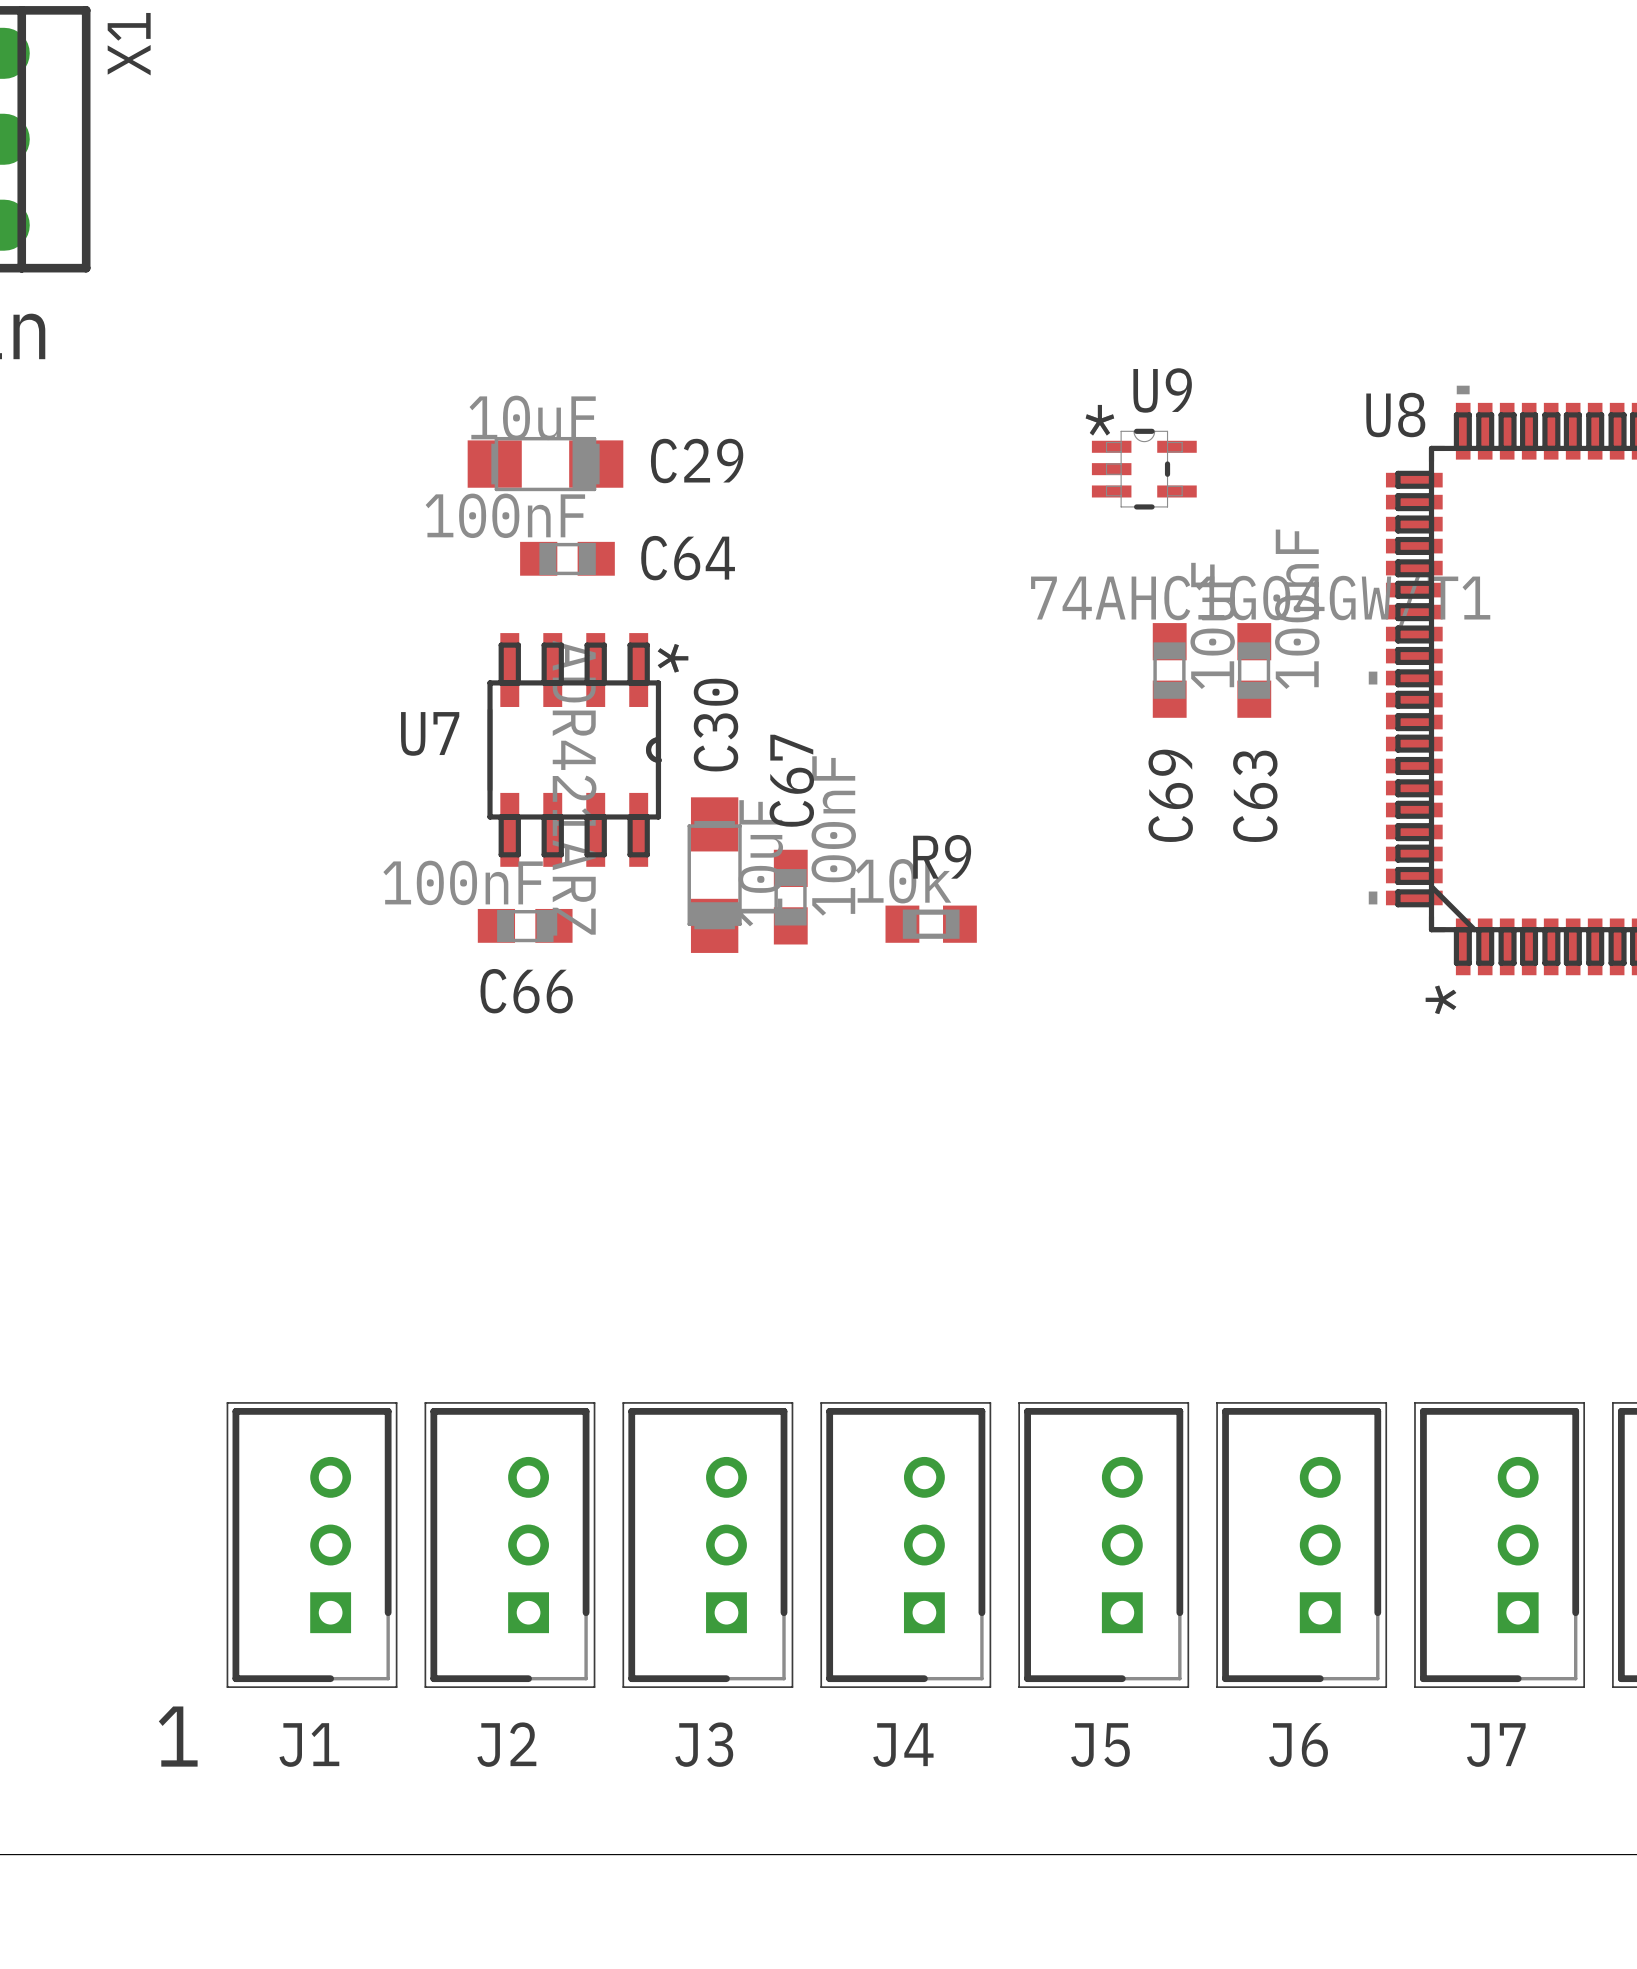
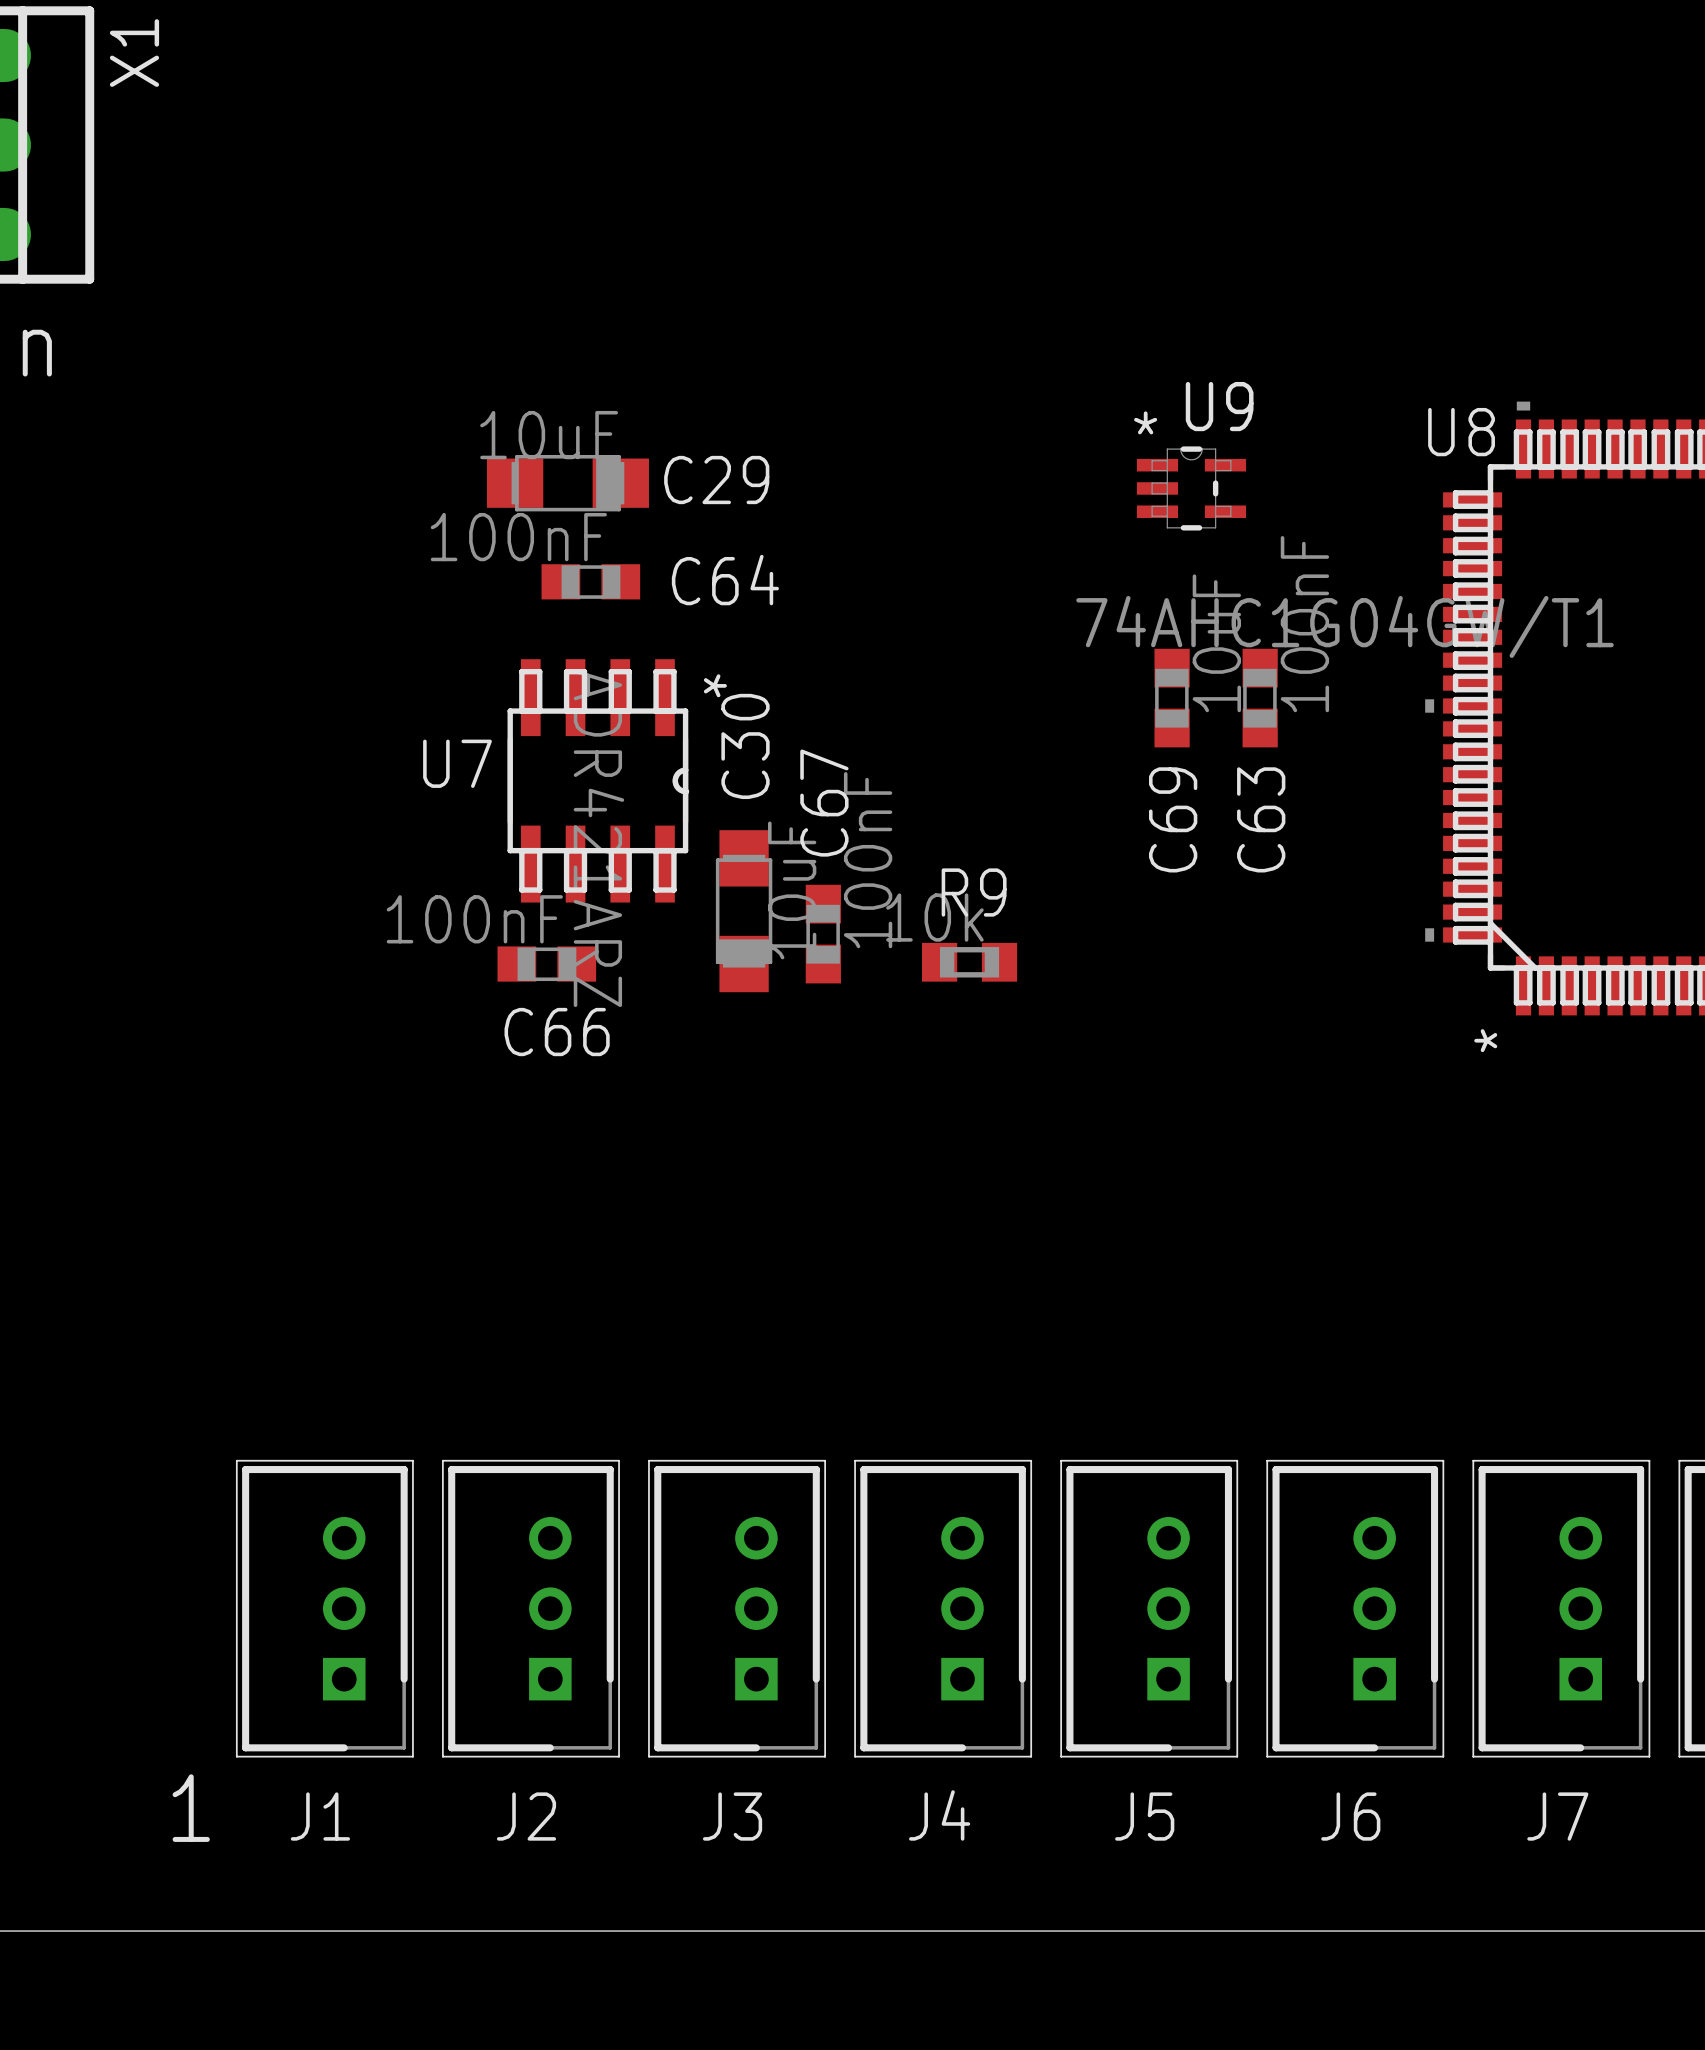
C69 position: (1169, 670) -> (1172, 698)
C63 position: (1254, 670) -> (1260, 698)

